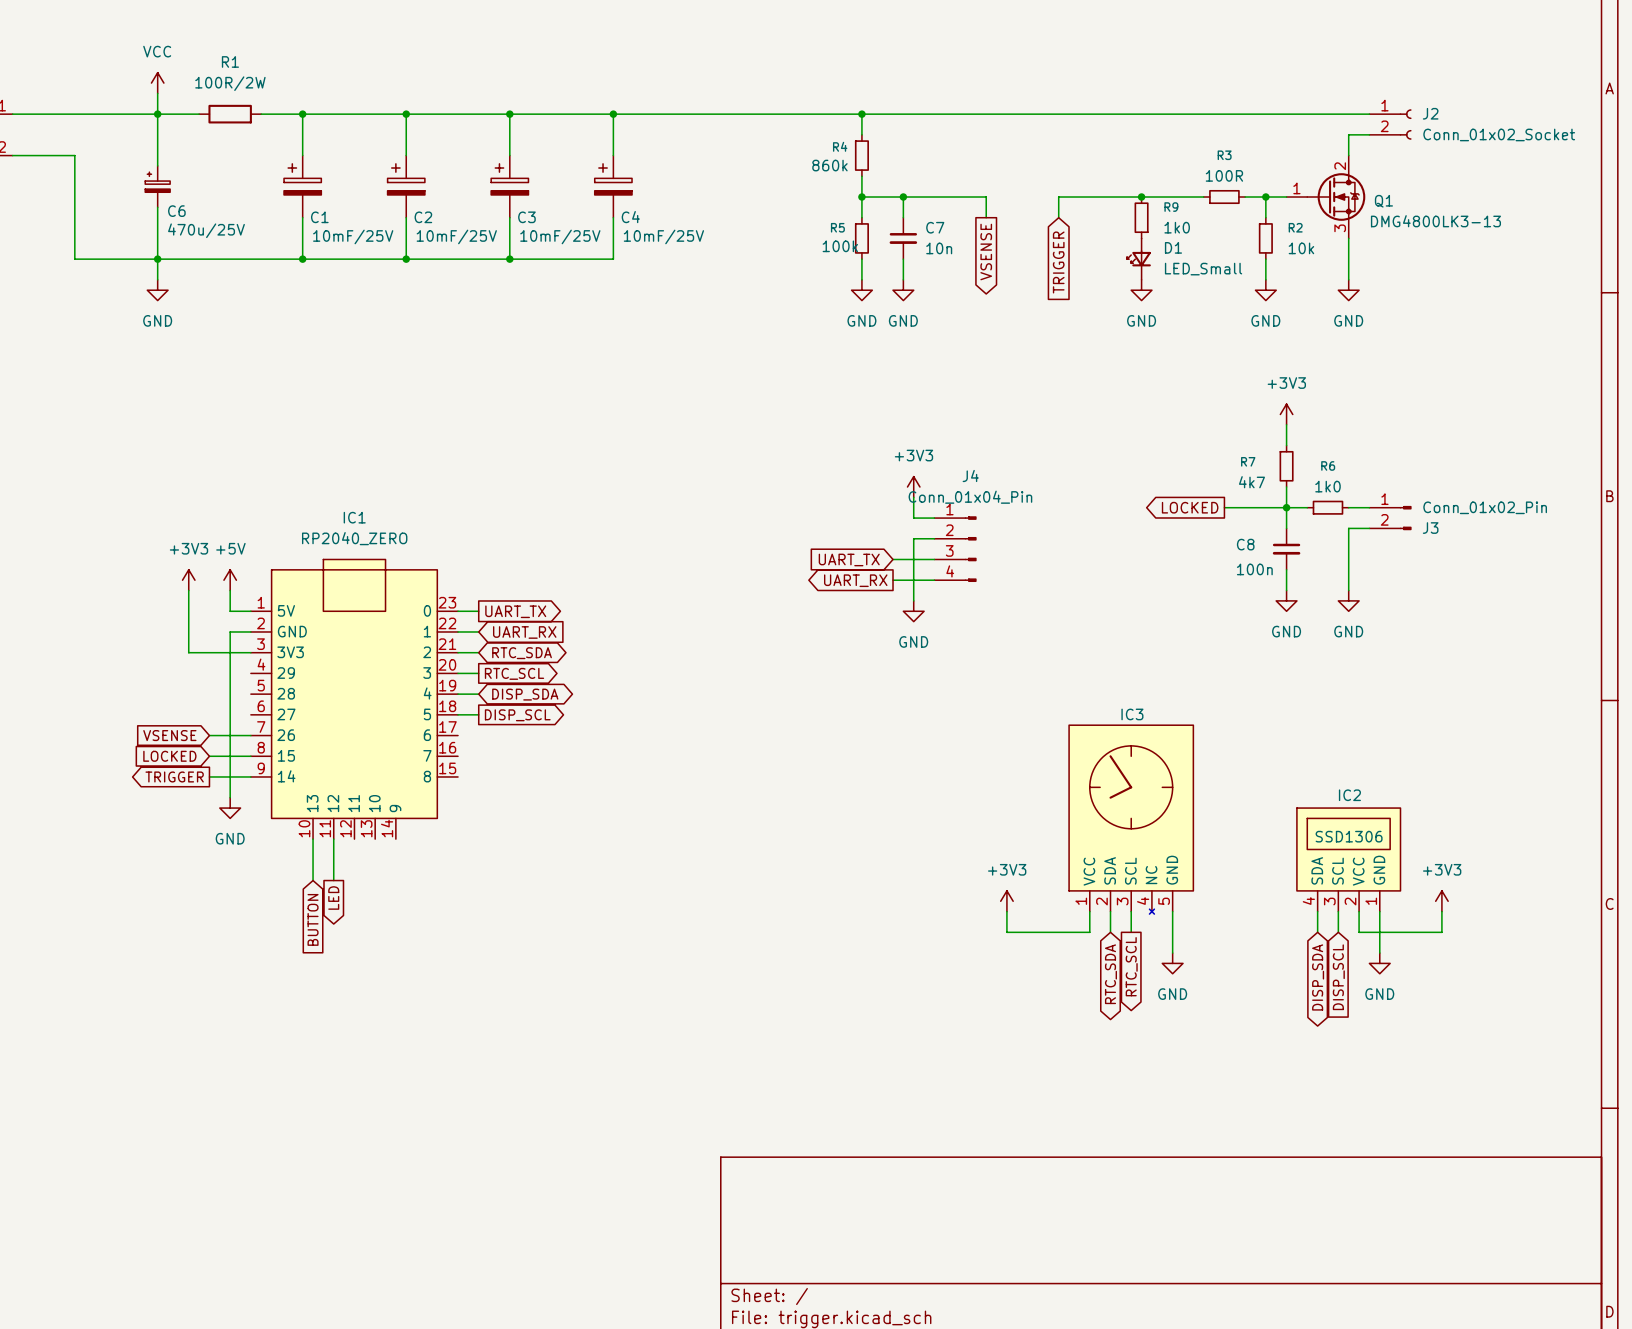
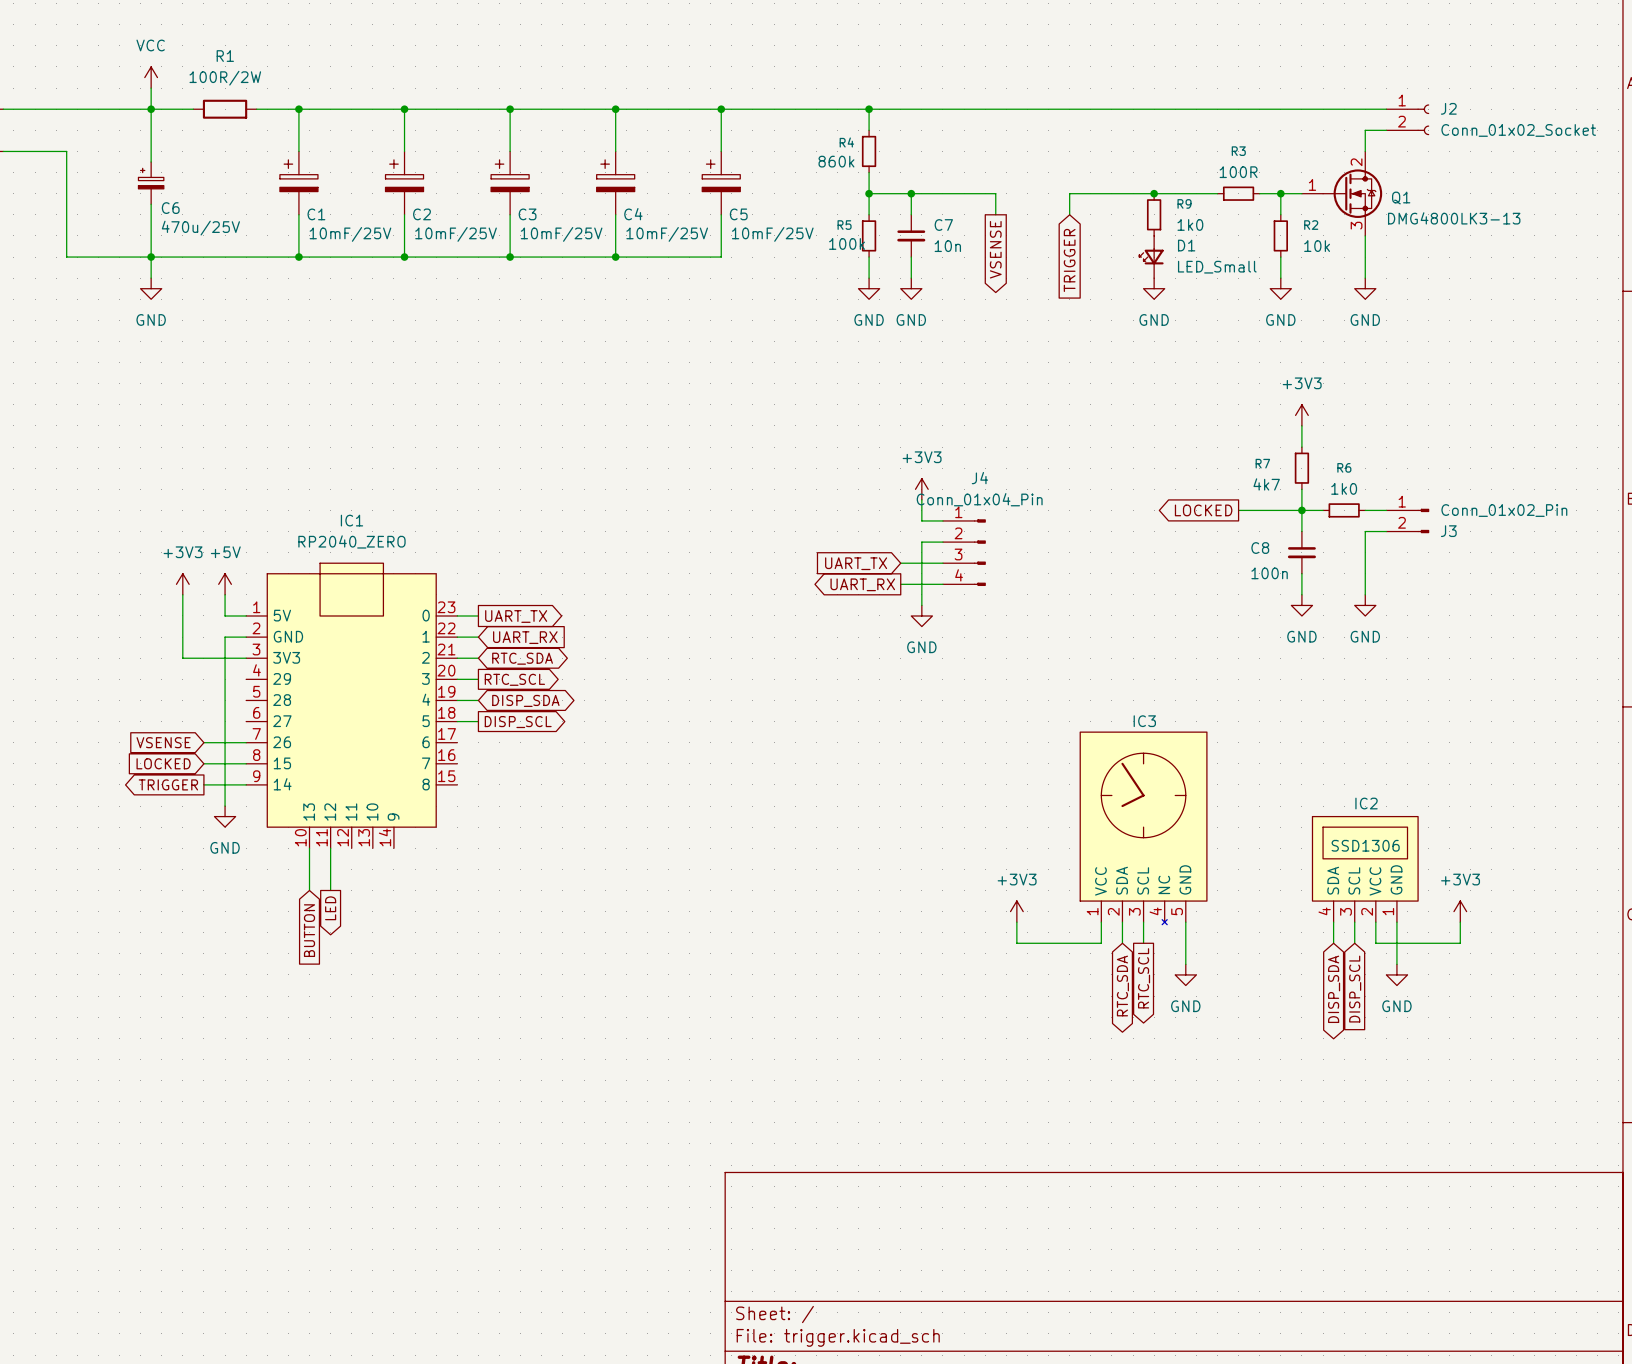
wire: none -> (721, 109) (721, 151)
junction: none -> (721, 109)
C5: none -> 10mF/25V (721, 183)
wire: none -> (721, 214) (721, 257) (615, 257)
junction: none -> (615, 257)

